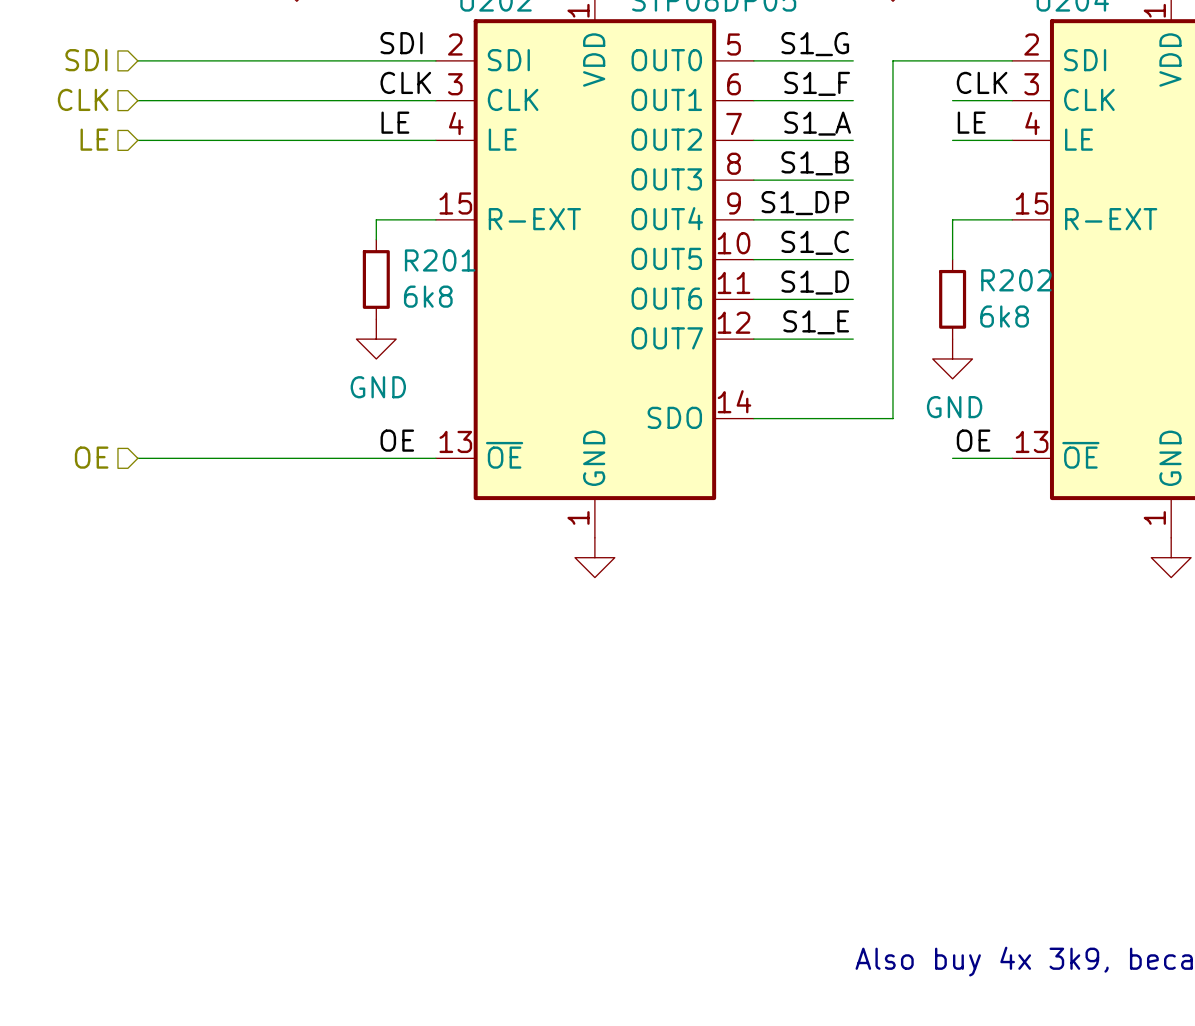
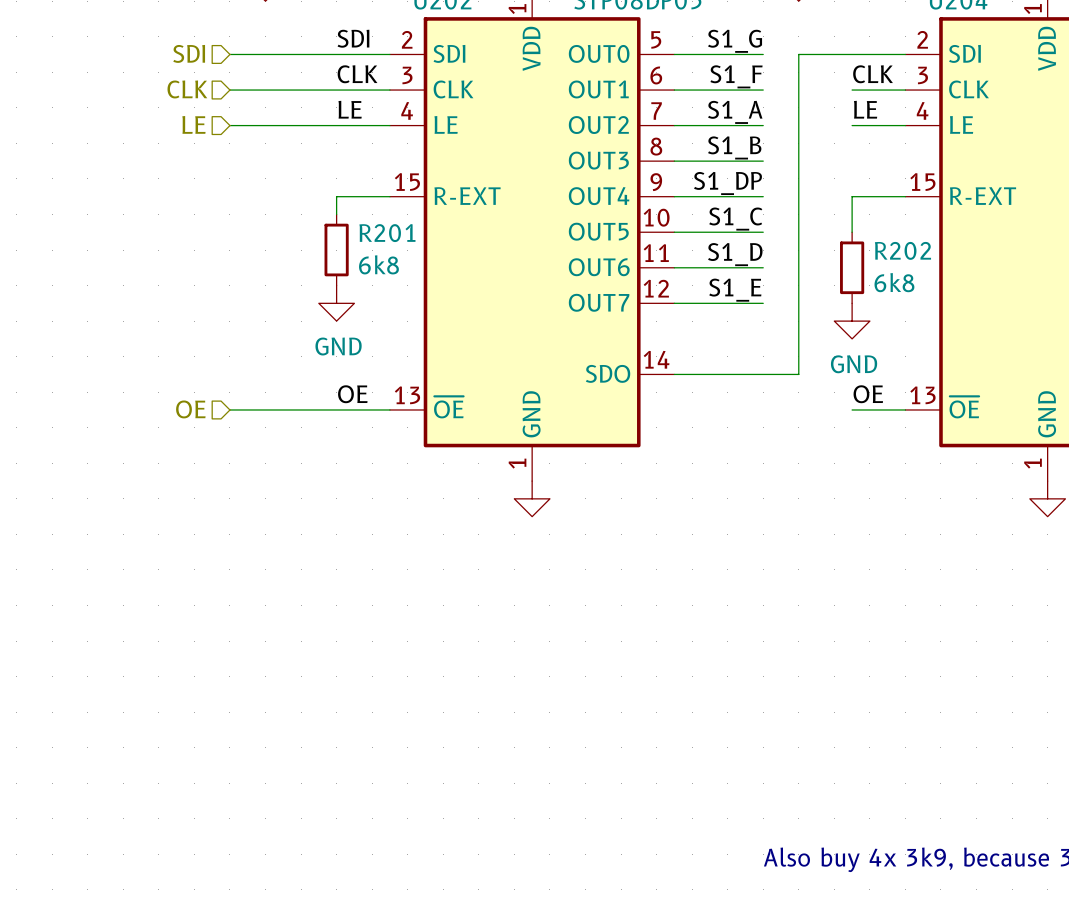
hierarchical label position: SDI (86, 60) -> SDI (189, 53)
wire: (137, 60) (257, 60) -> none
hierarchical label position: CLK (83, 99) -> CLK (187, 89)
wire: (137, 100) (257, 100) -> none
hierarchical label position: LE (94, 139) -> LE (193, 124)
wire: (137, 140) (257, 140) -> none
hierarchical label position: OE (91, 457) -> OE (190, 409)
wire: (137, 458) (257, 458) -> none

